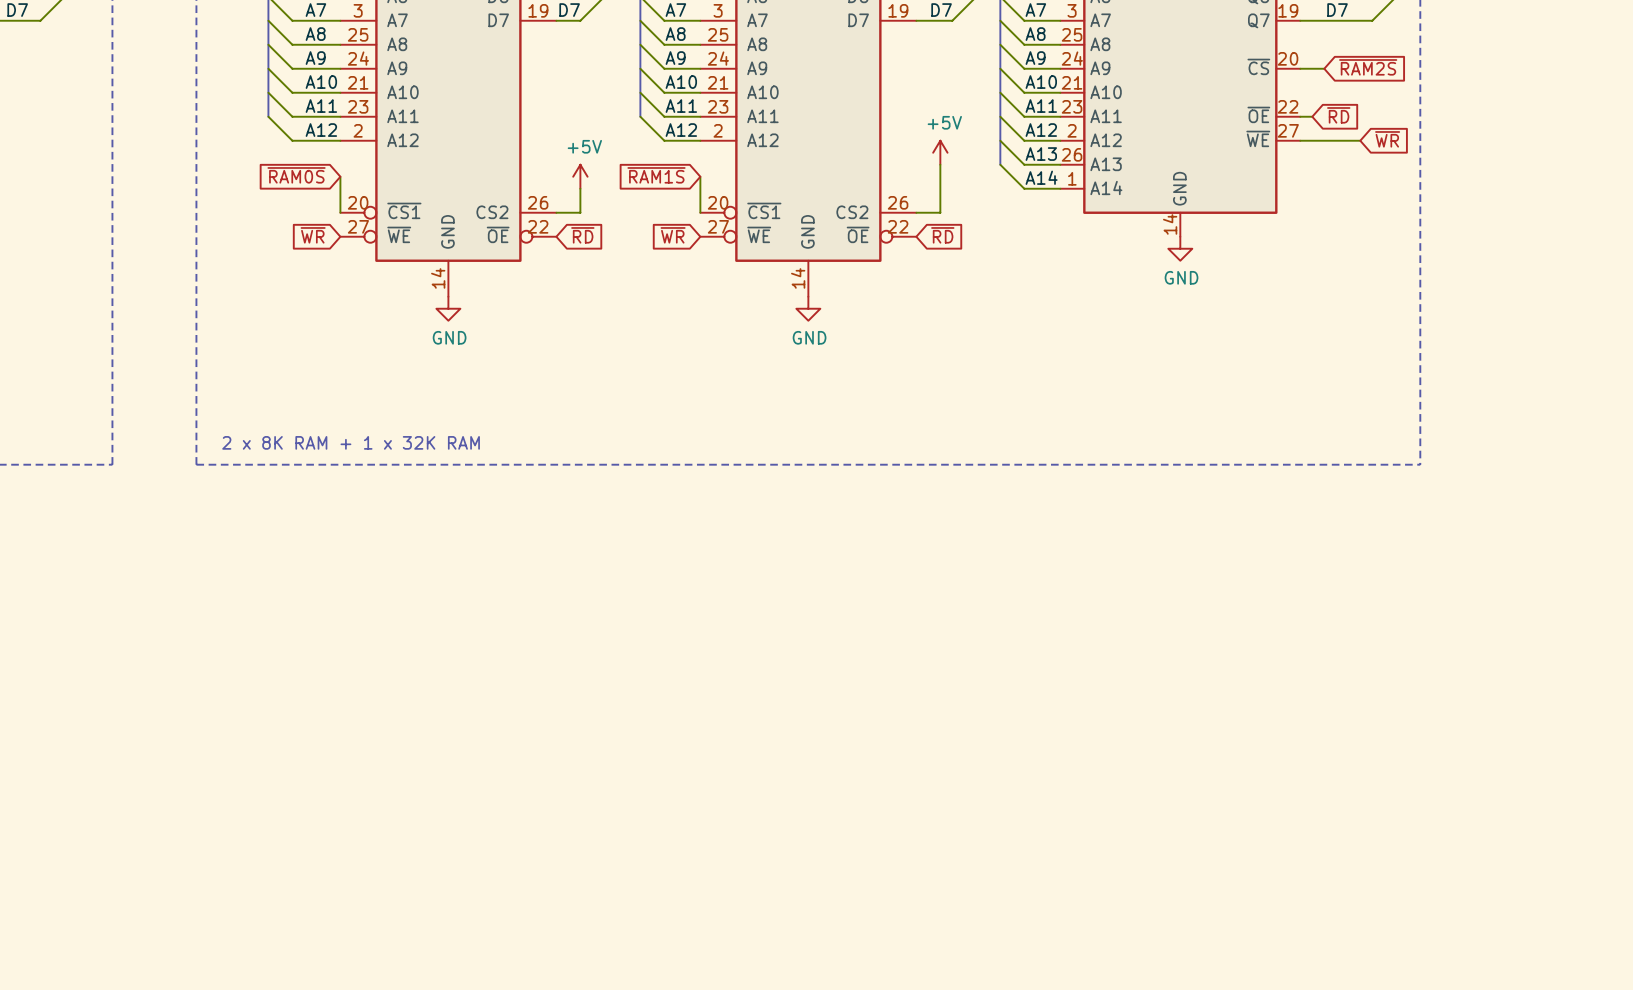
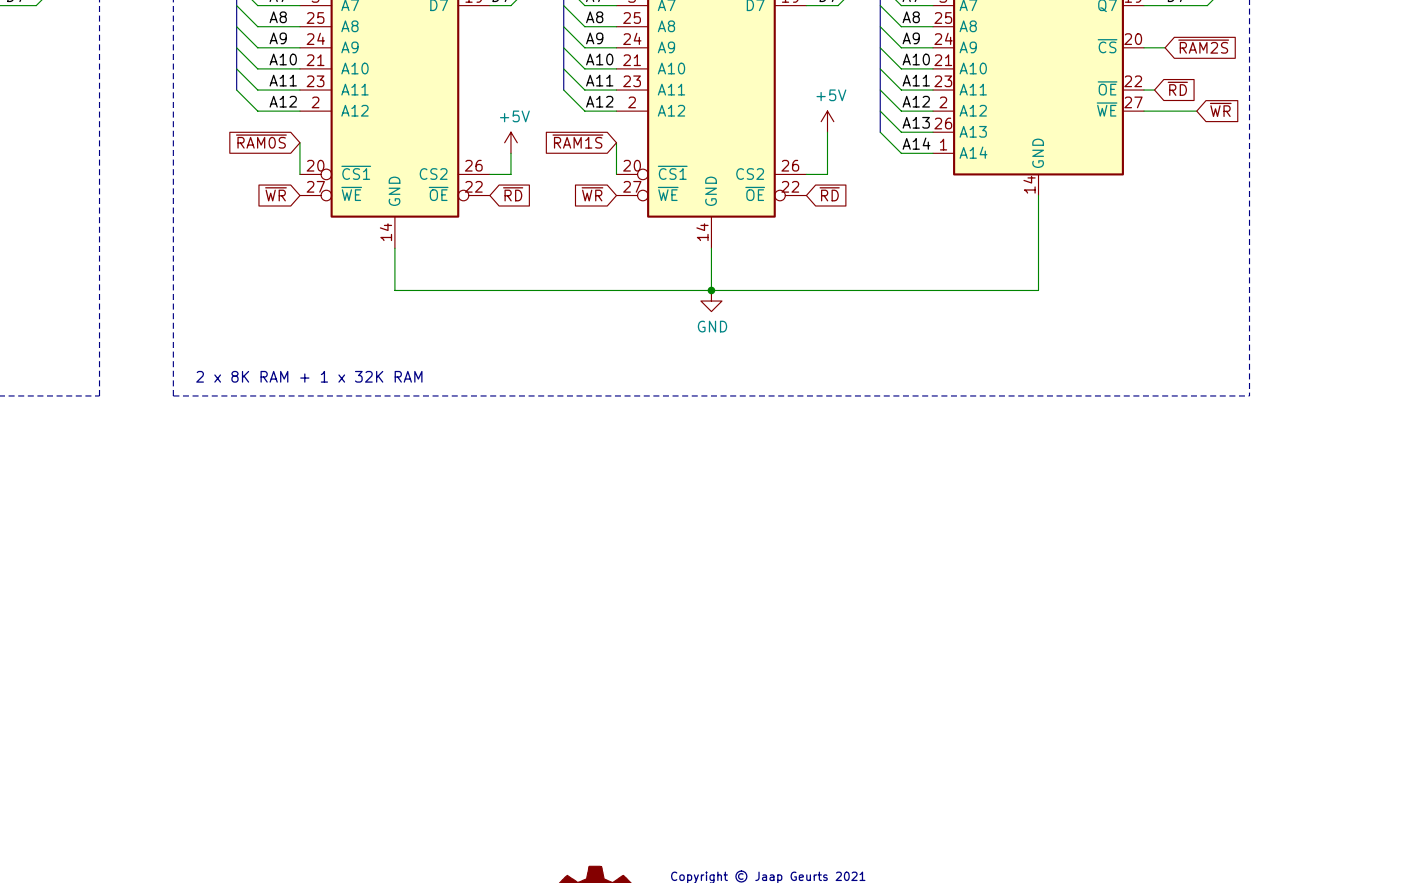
wire: none -> (1038, 195) (1038, 290) (394, 290) (394, 248)
power symbol: GND (1180, 248) -> none
wire: none -> (711, 248) (711, 290)
power symbol: GND (448, 308) -> none
power symbol position: GND (808, 308) -> GND (711, 301)
junction: none -> (711, 290)

